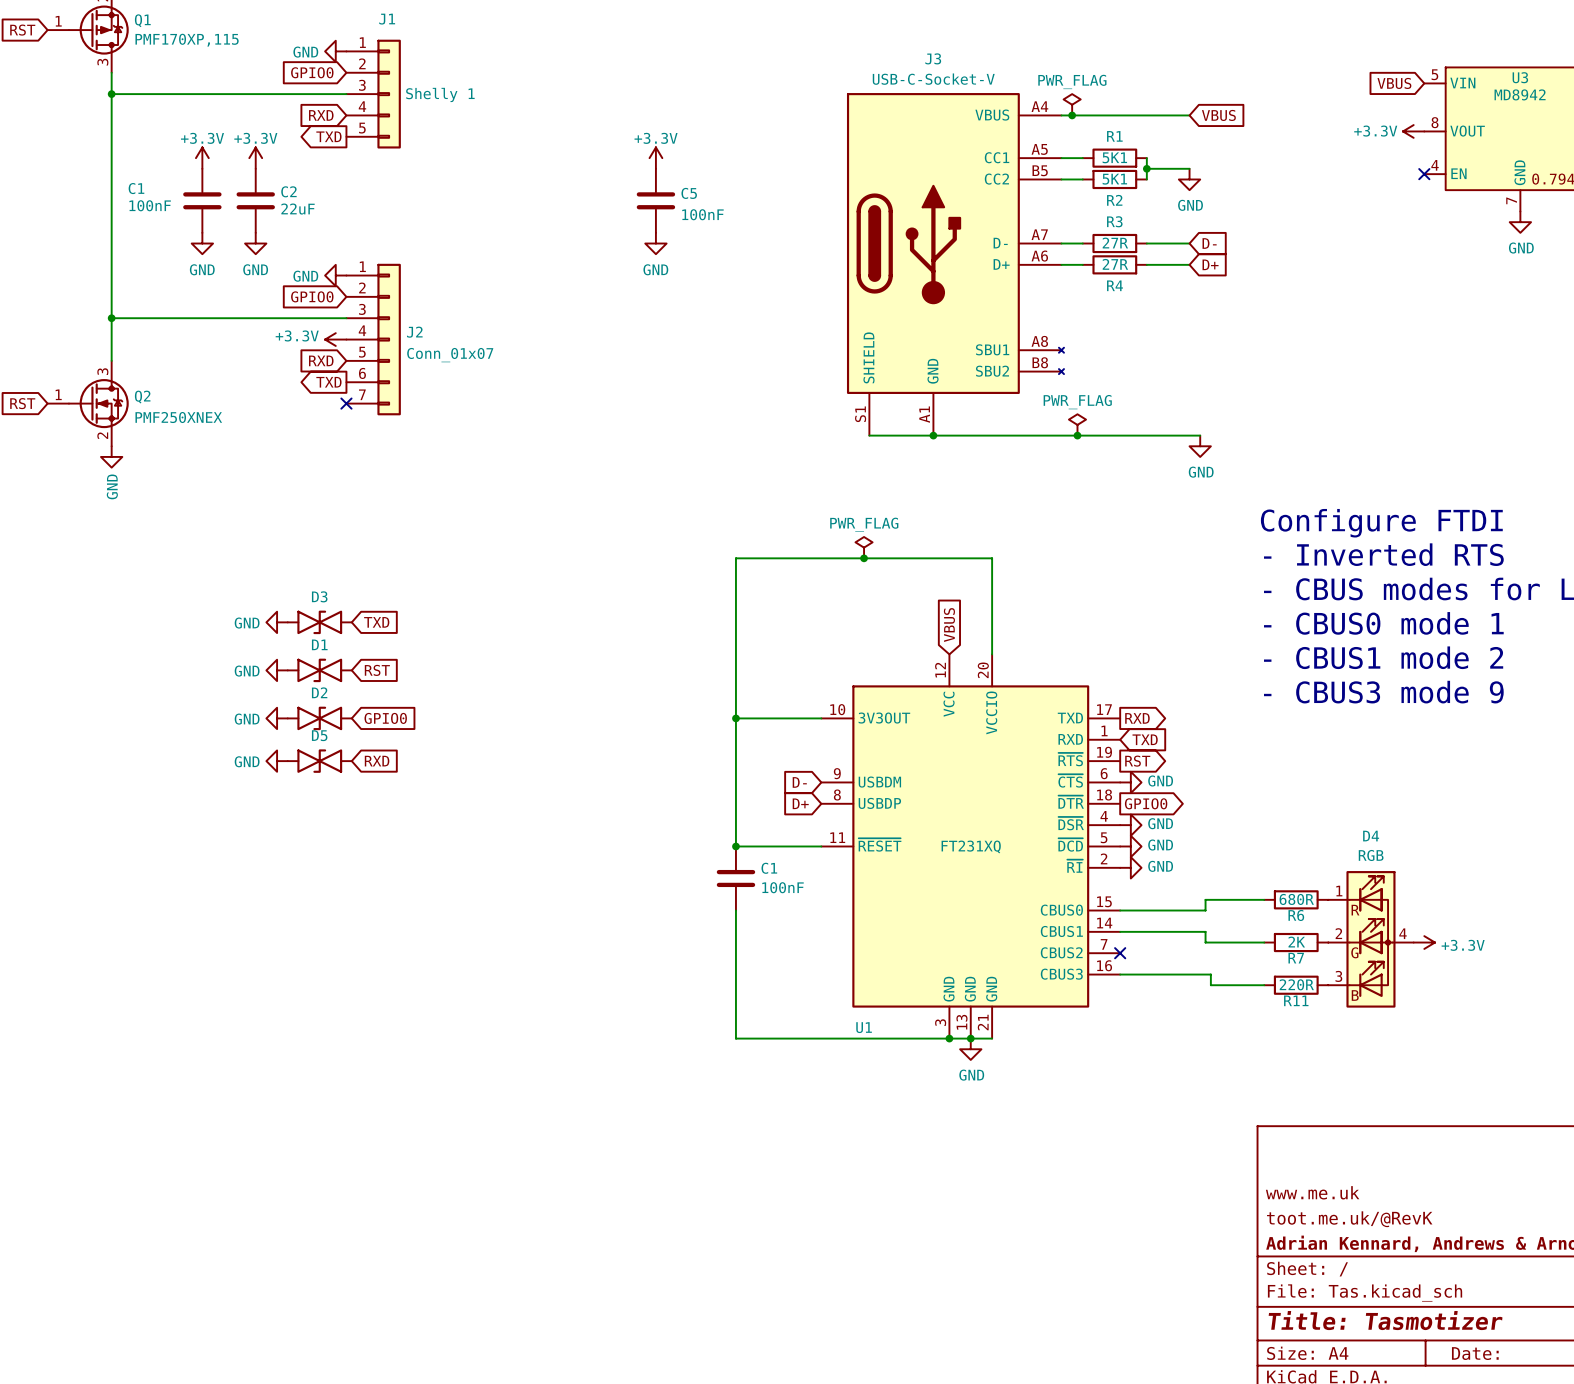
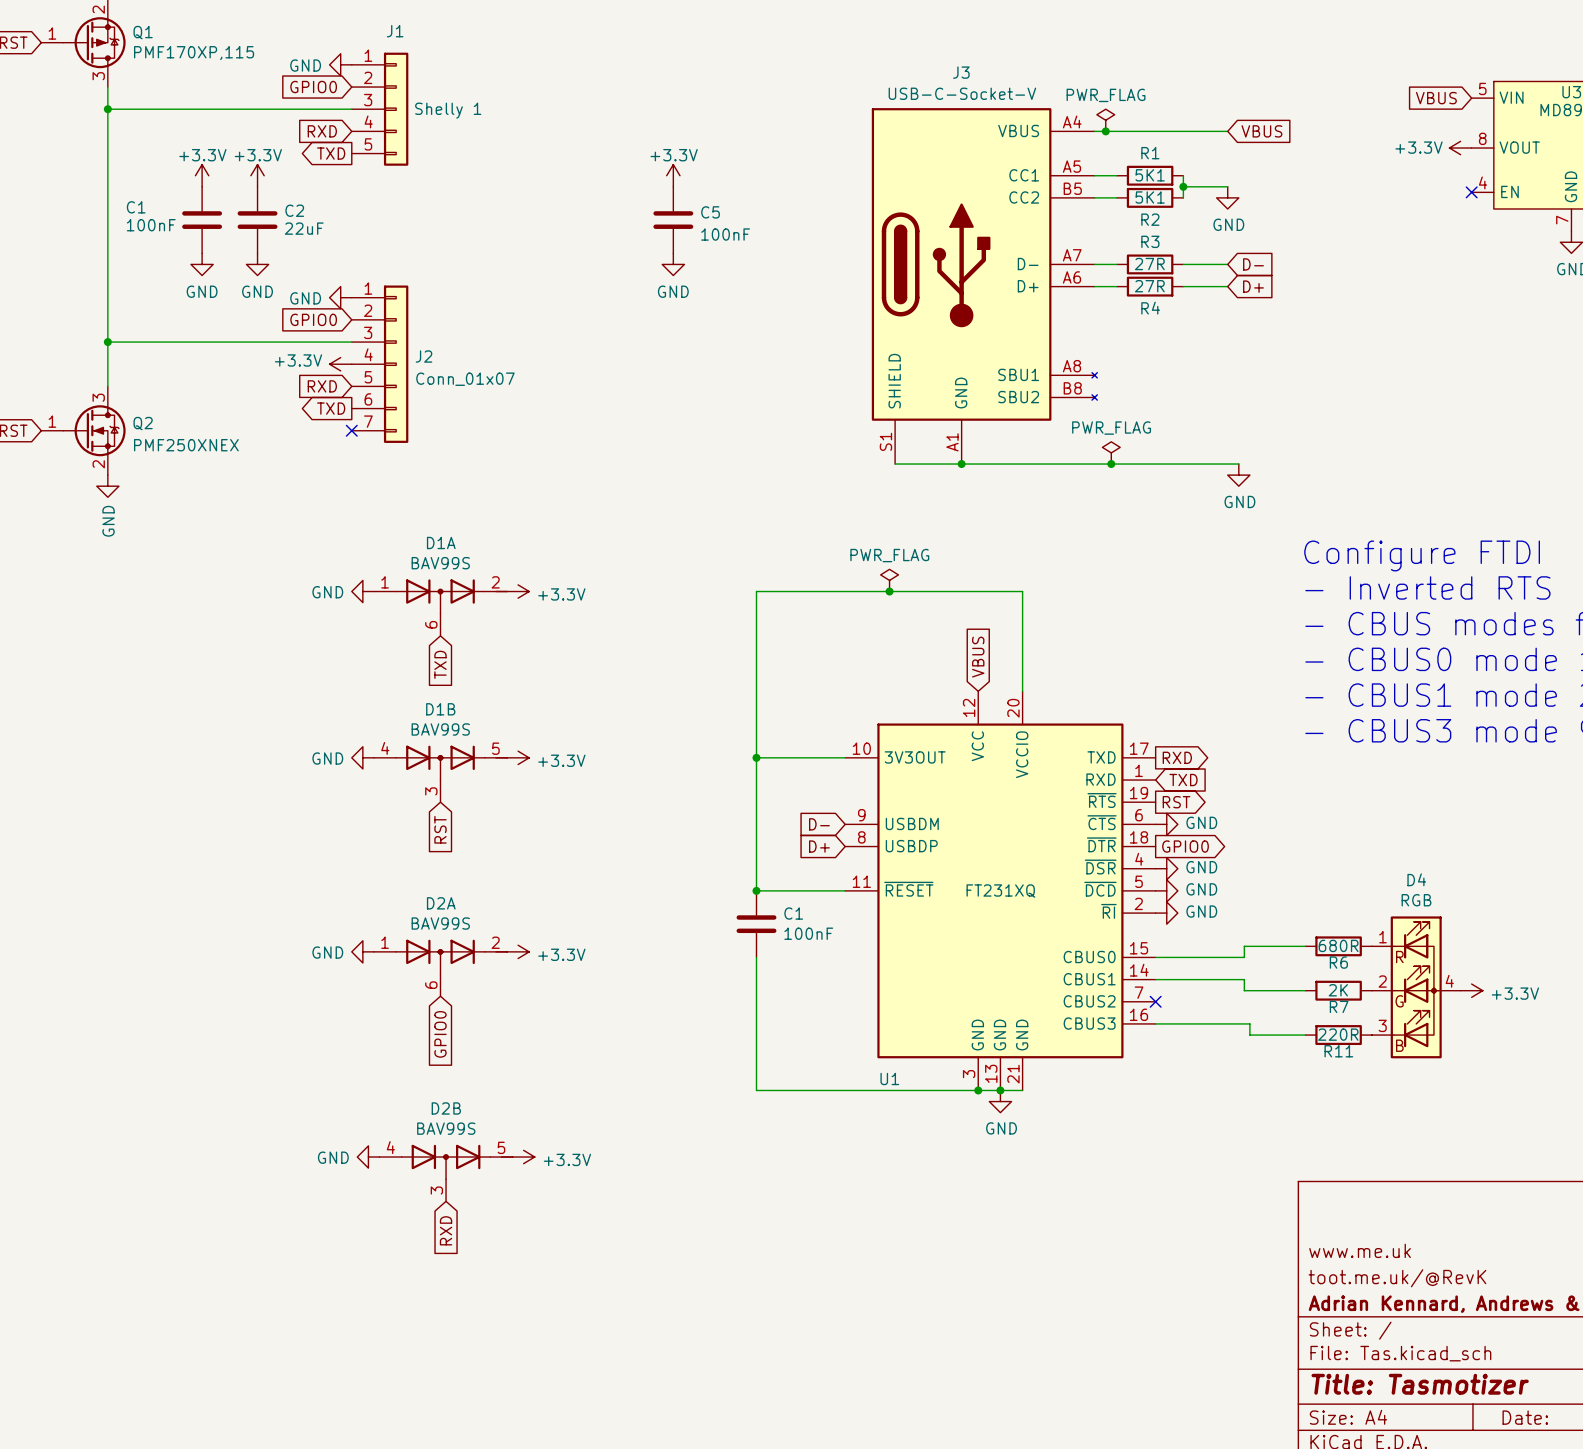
power symbol: none -> GND (362, 591)
power symbol: none -> +3.3V (518, 591)
D1A: none -> BAV99S (440, 607)
power symbol: GND (277, 622) -> none
D3: (319, 622) -> none
global label rotation: 0° (376, 622) -> 90° clockwise (440, 664)
power symbol: GND (277, 670) -> none
D1: (319, 670) -> none
global label rotation: 0° (377, 670) -> 90° clockwise (440, 829)
global label position: RST (377, 670) -> RST (440, 829)
power symbol: GND (277, 718) -> none
D2: (319, 718) -> none
power symbol: none -> GND (362, 757)
global label: GPIO0 (385, 718) -> none
power symbol: none -> +3.3V (518, 757)
D1B: none -> BAV99S (440, 773)
power symbol: GND (277, 761) -> none
D5: (319, 761) -> none
global label: RXD (377, 761) -> none
power symbol: none -> GND (362, 951)
power symbol: none -> +3.3V (518, 951)
D2A: none -> BAV99S (440, 967)
global label: none -> GPIO0 (440, 1034)
power symbol: none -> GND (368, 1157)
power symbol: none -> +3.3V (523, 1157)
D2B: none -> BAV99S (446, 1173)
global label: none -> RXD (446, 1230)

